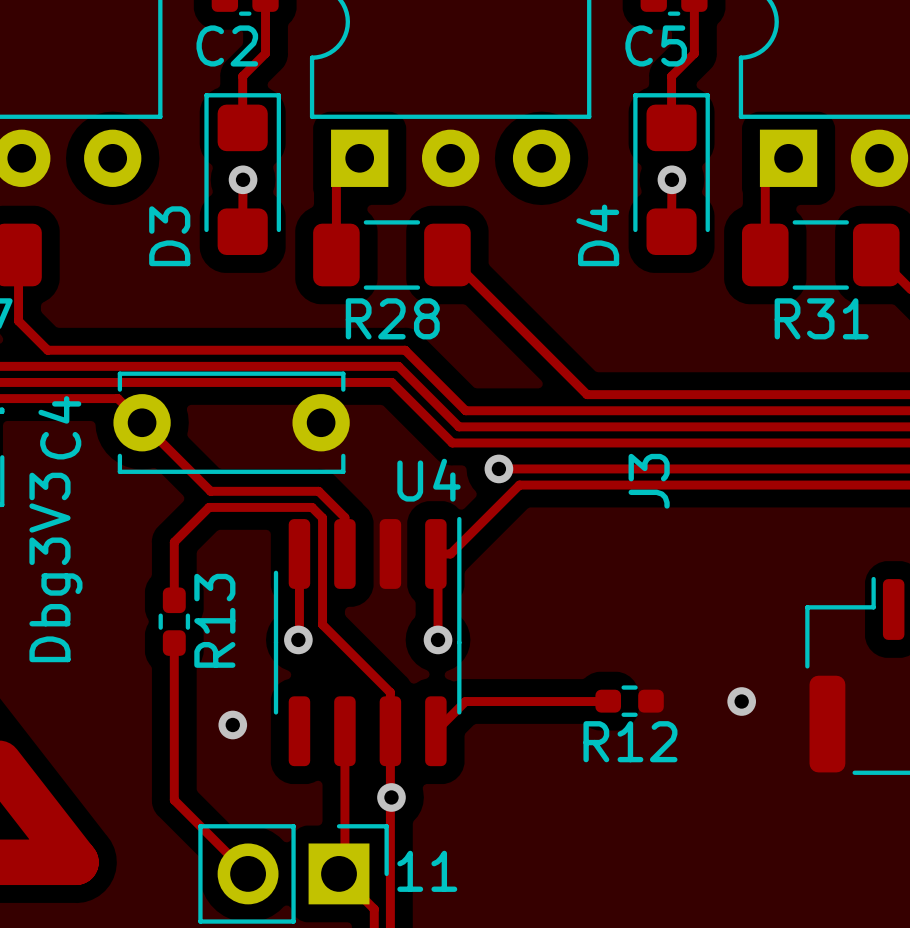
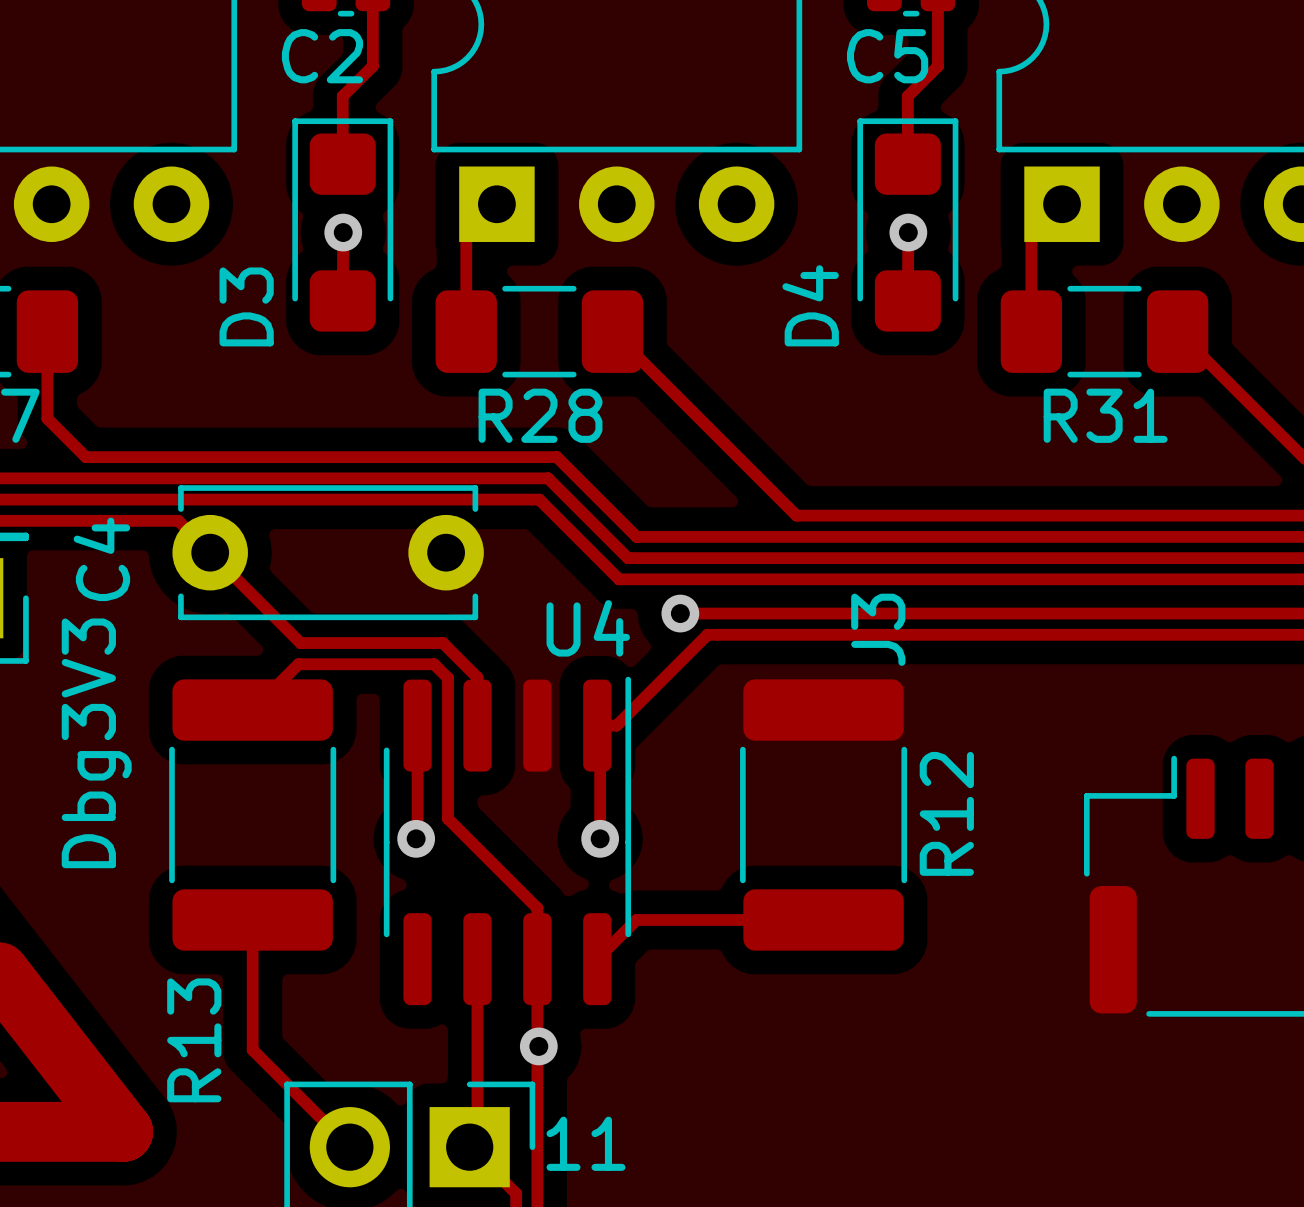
track: (174, 542) (174, 600) -> none
R13 footprint: [158, 587, 191, 656] -> [169, 679, 337, 951]
R13 name position: R13 (214, 620) -> R13 (194, 1040)
track: (174, 643) (174, 701) -> none
R12 footprint: [595, 685, 664, 717] -> [740, 679, 908, 951]
via: (741, 701) -> none
via: (232, 725) -> none
R12 name position: R12 (630, 741) -> R12 (946, 813)

